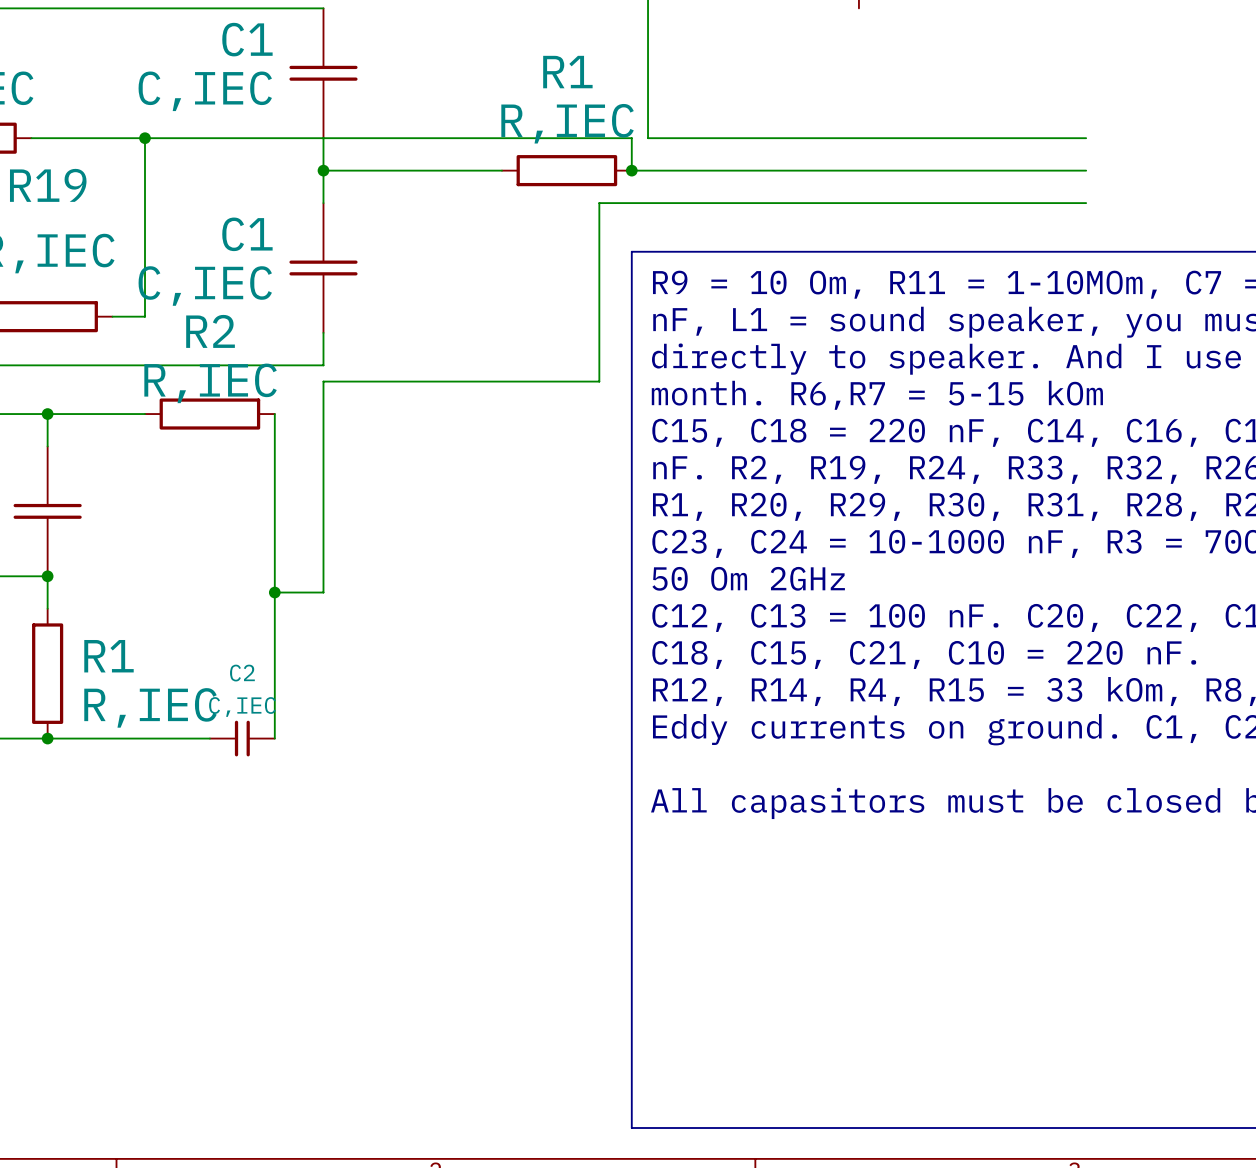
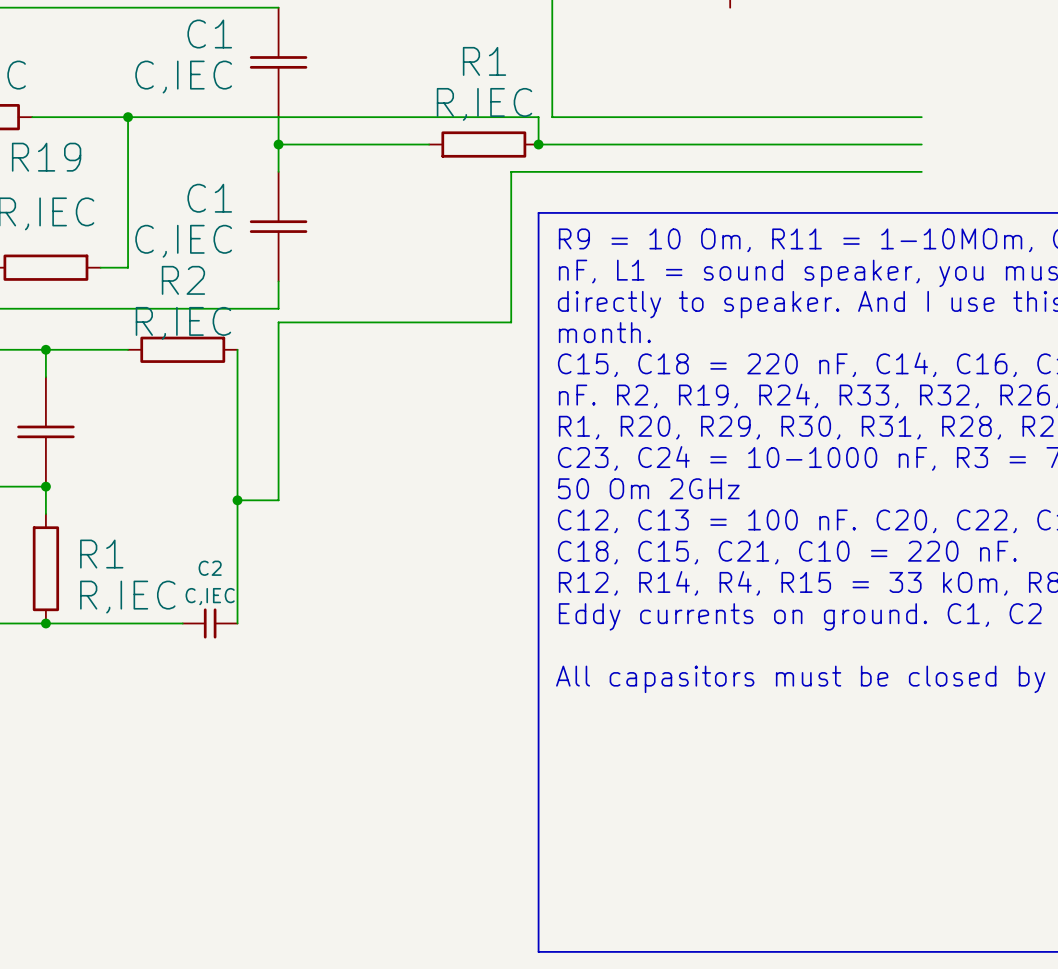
text: month. R6,R7 = 5-15 kOm (877, 395) -> month. (604, 332)

